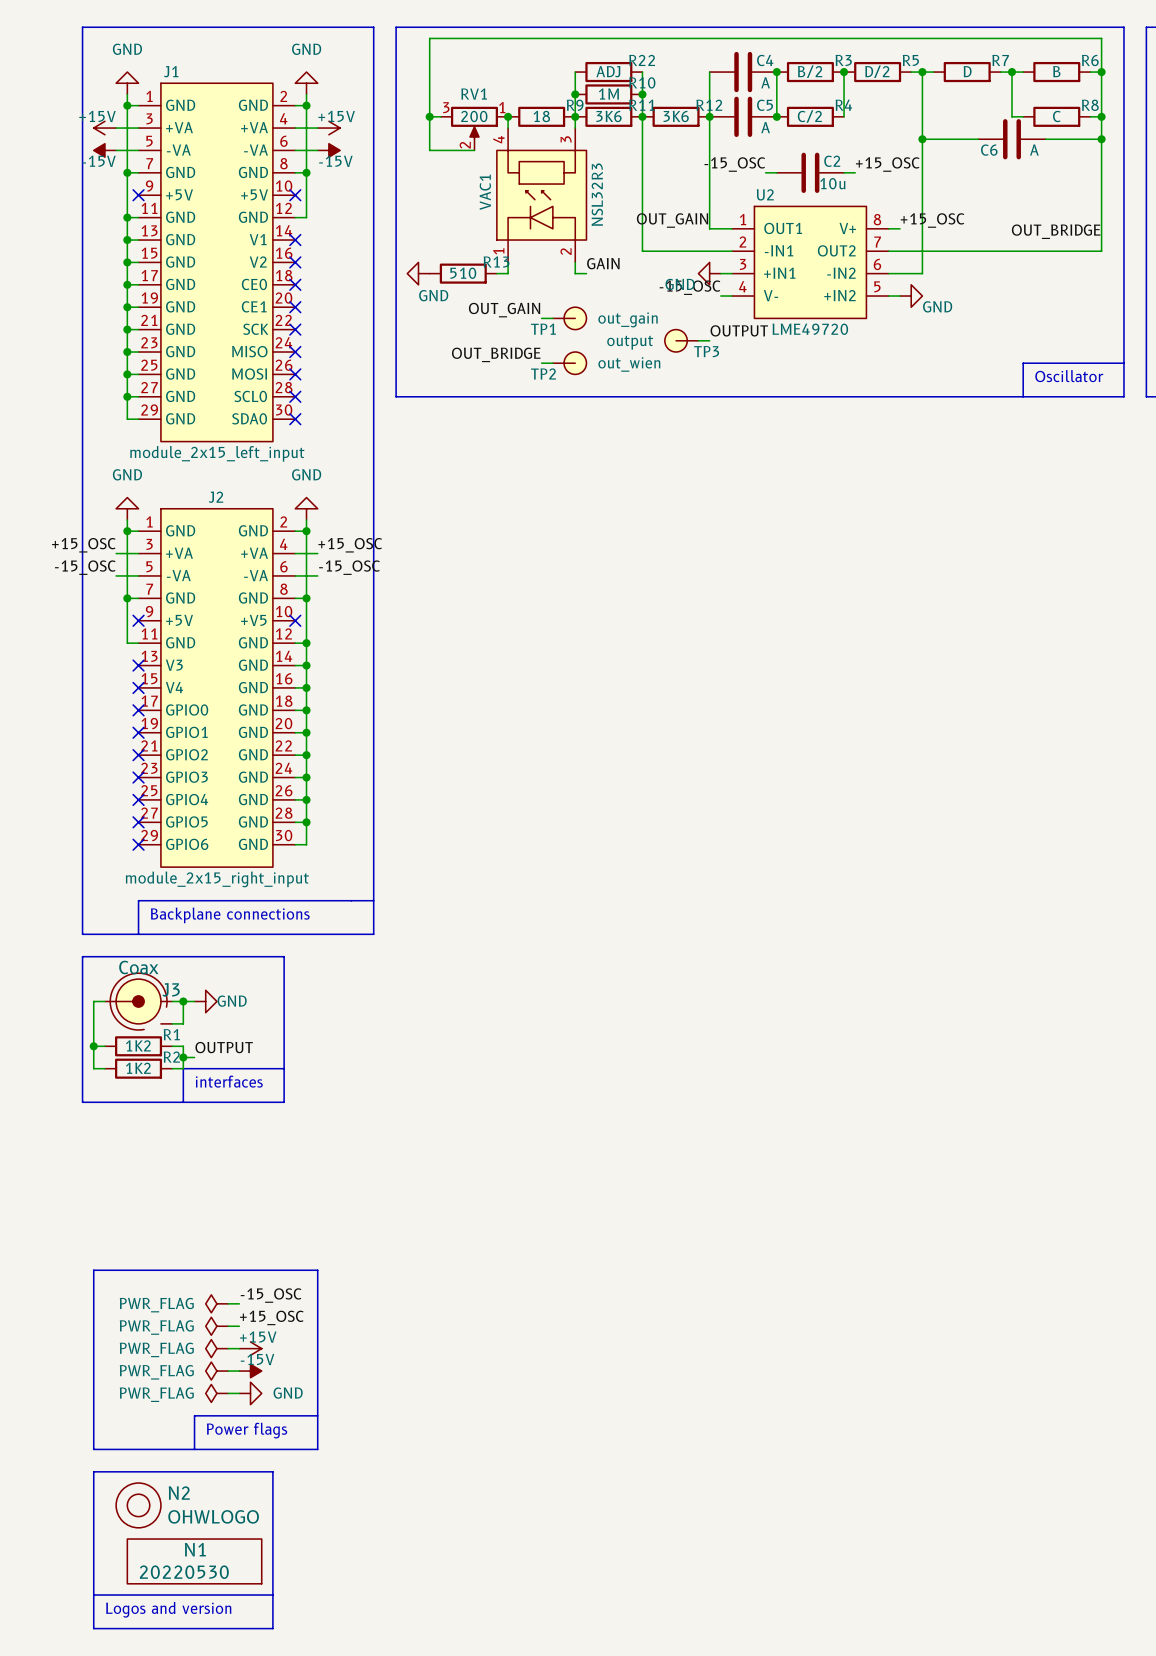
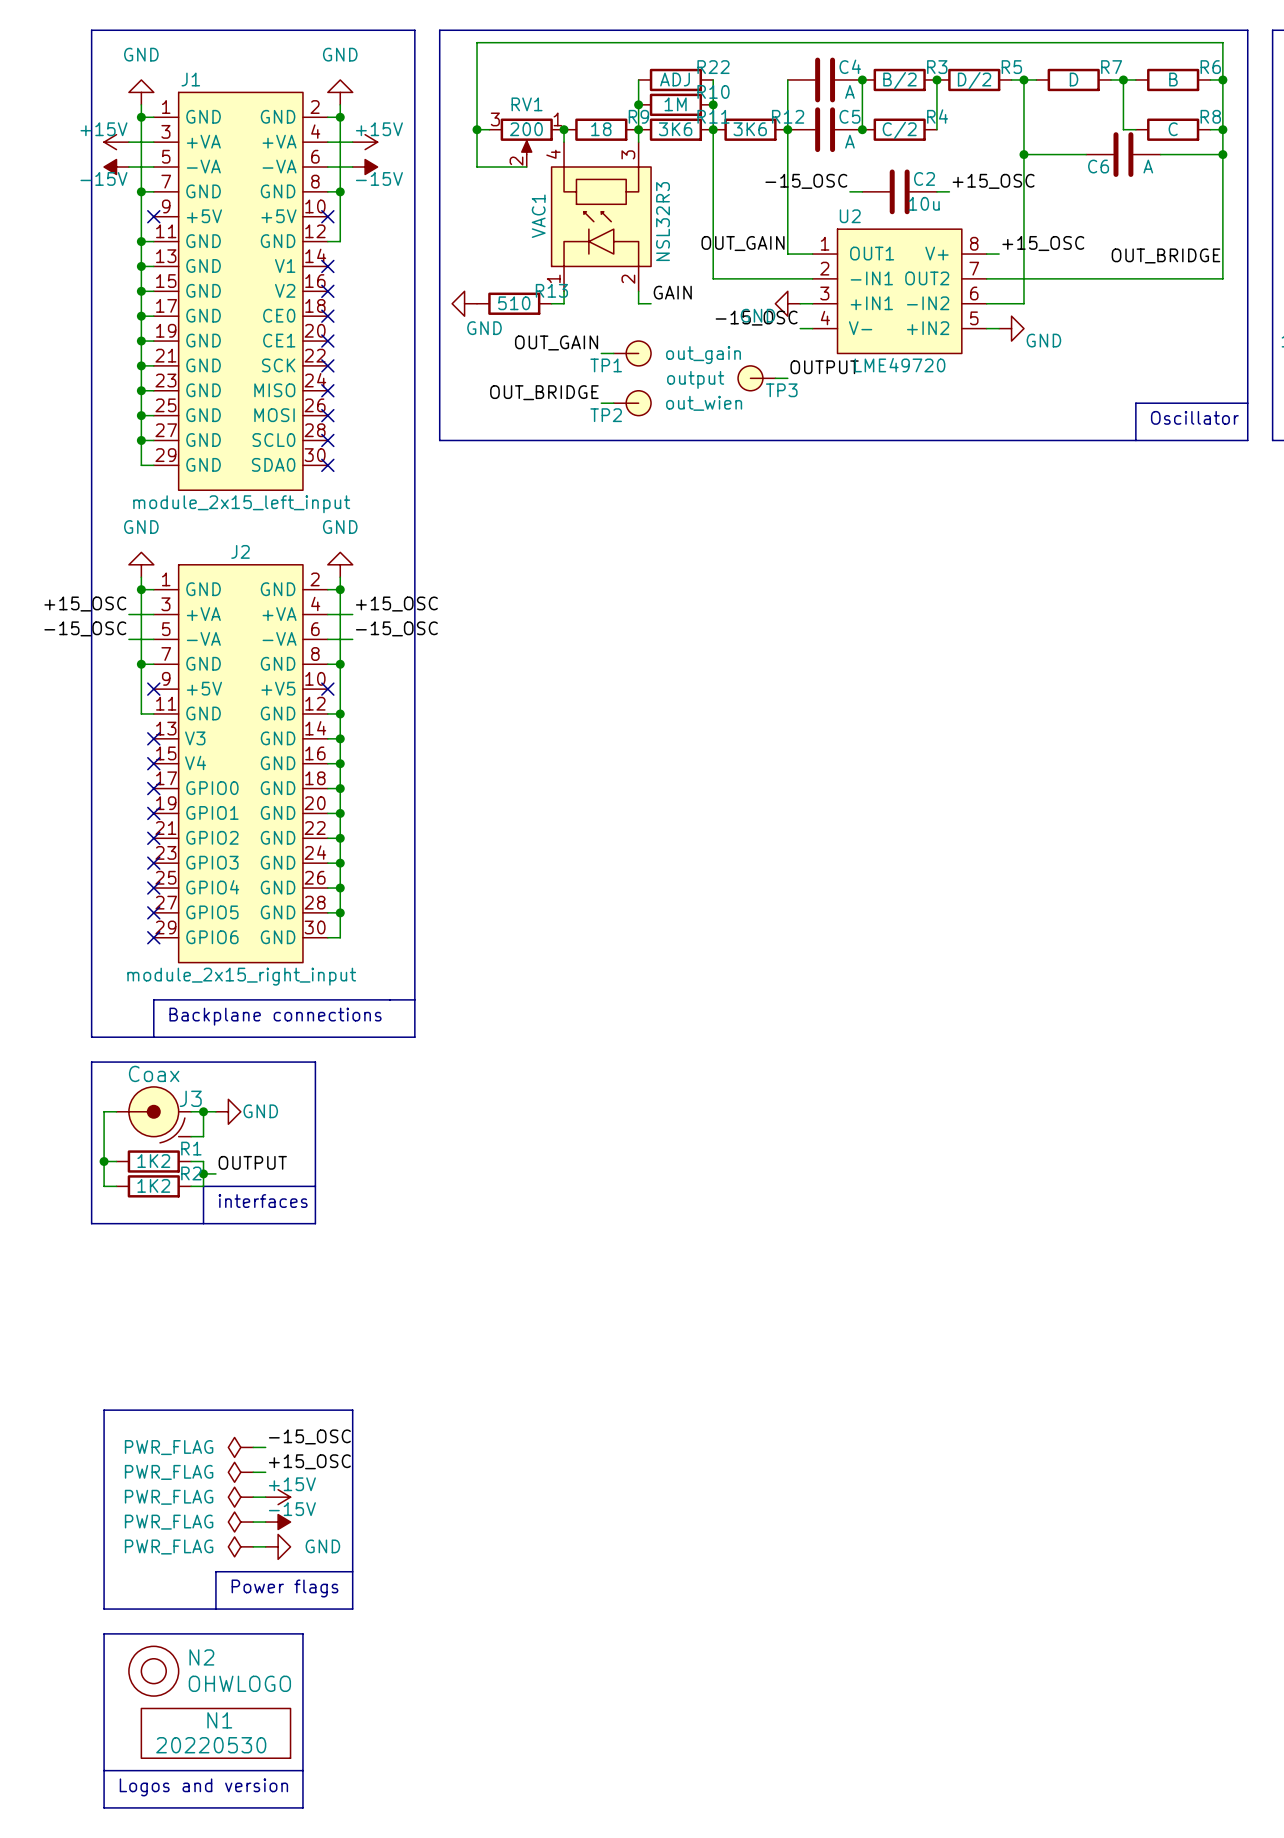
J3 symbol: [104, 973, 173, 1030] -> [116, 1086, 192, 1143]

